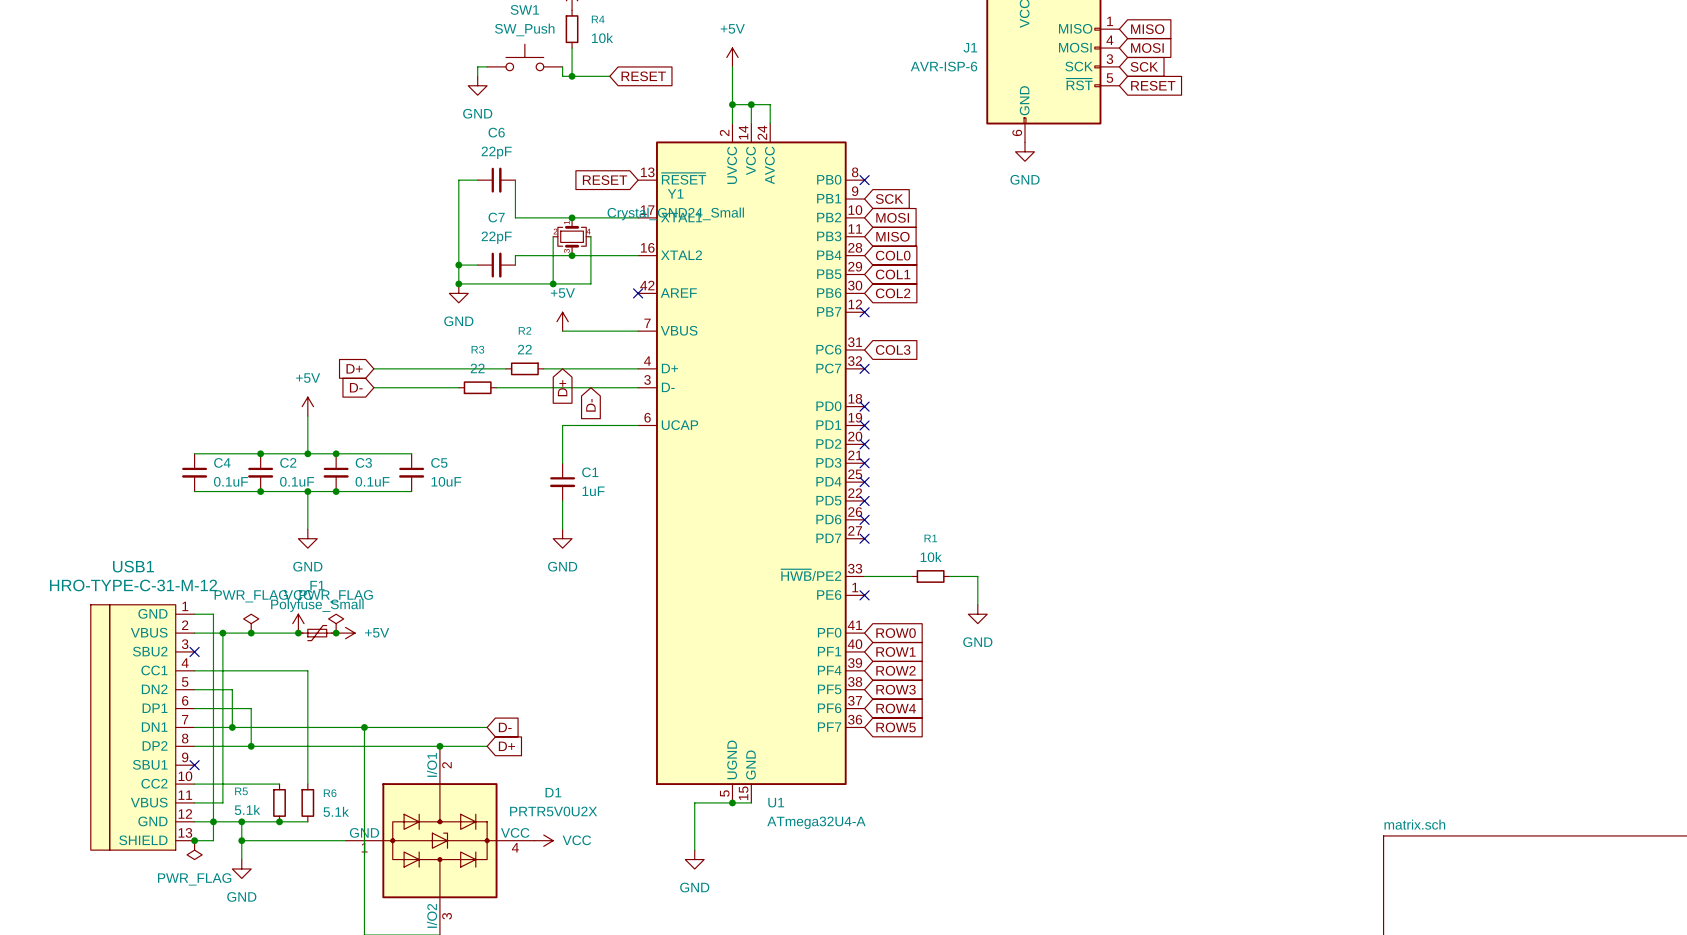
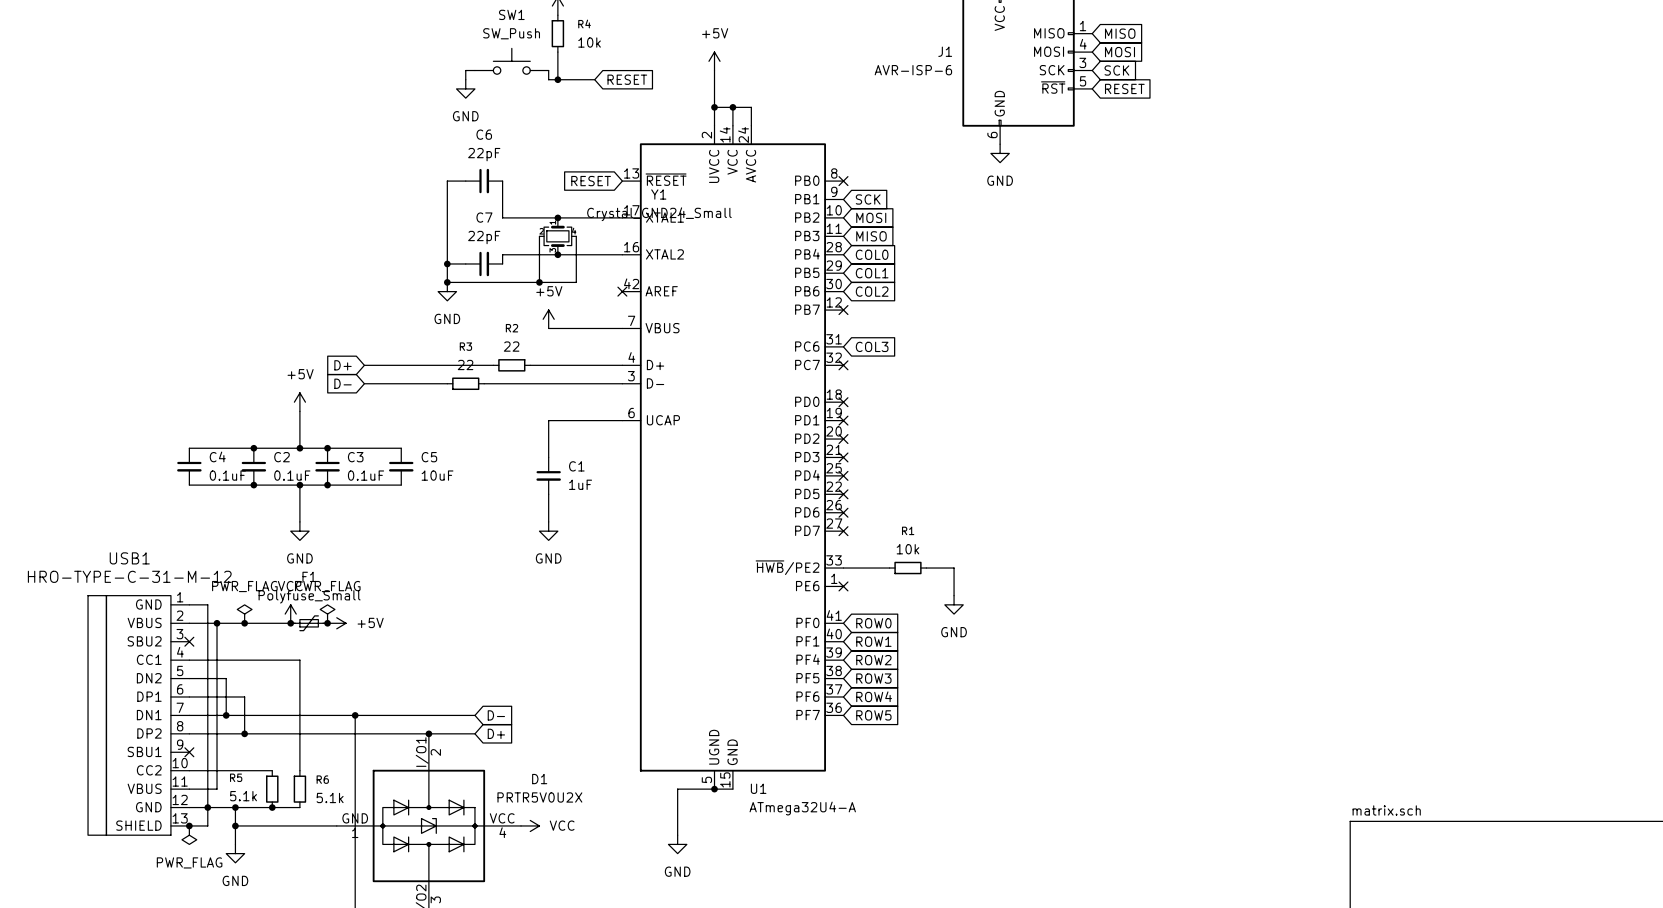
global label: D+ (562, 388) -> none
global label: D- (590, 405) -> none

